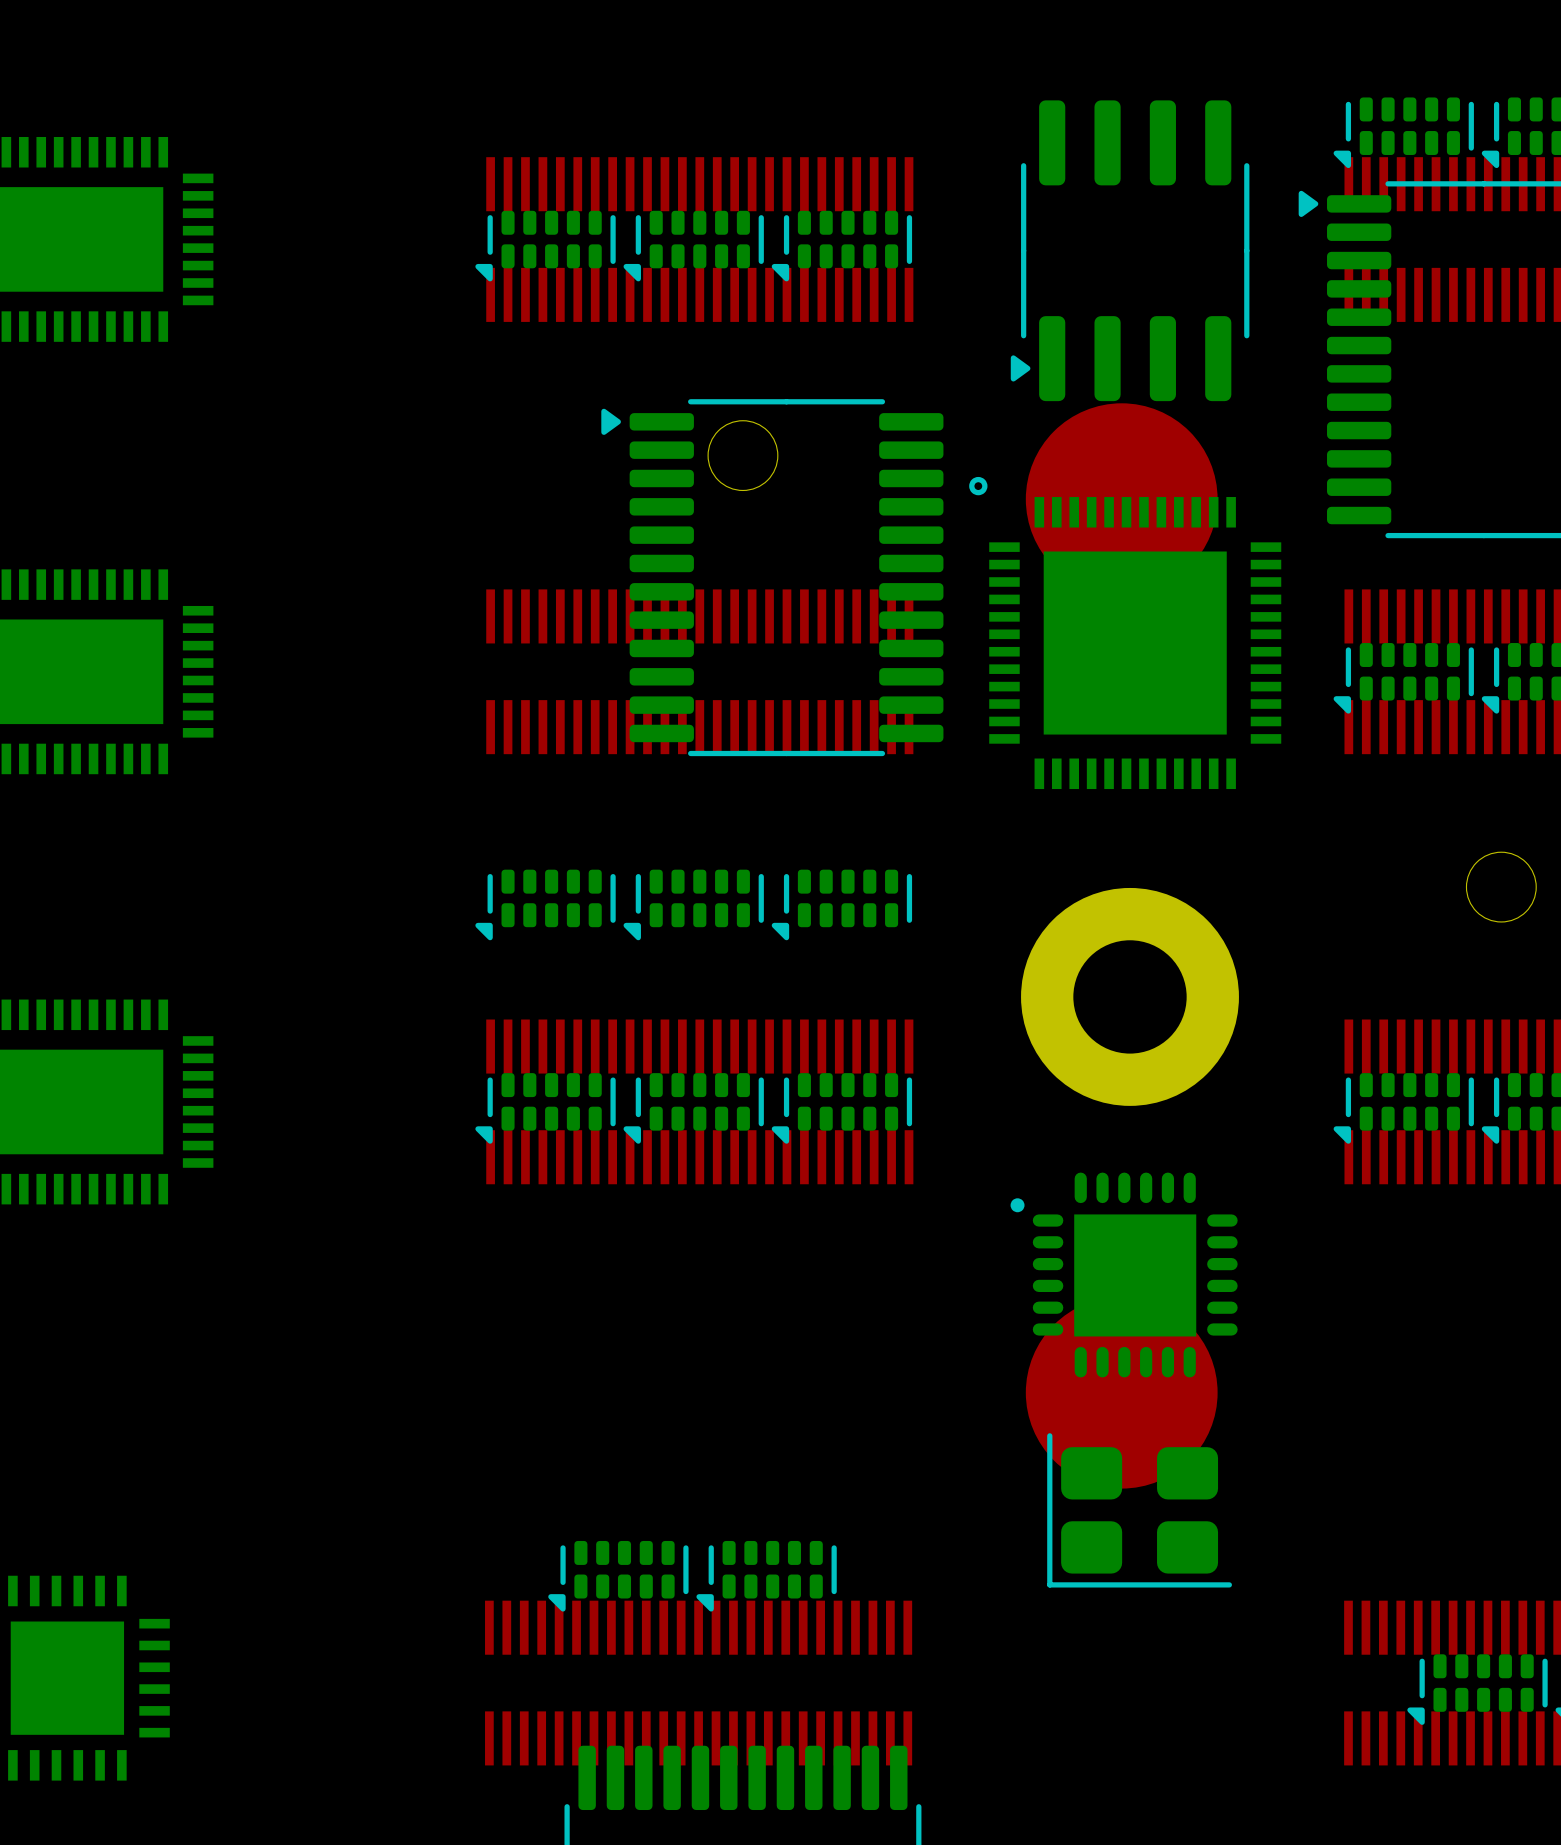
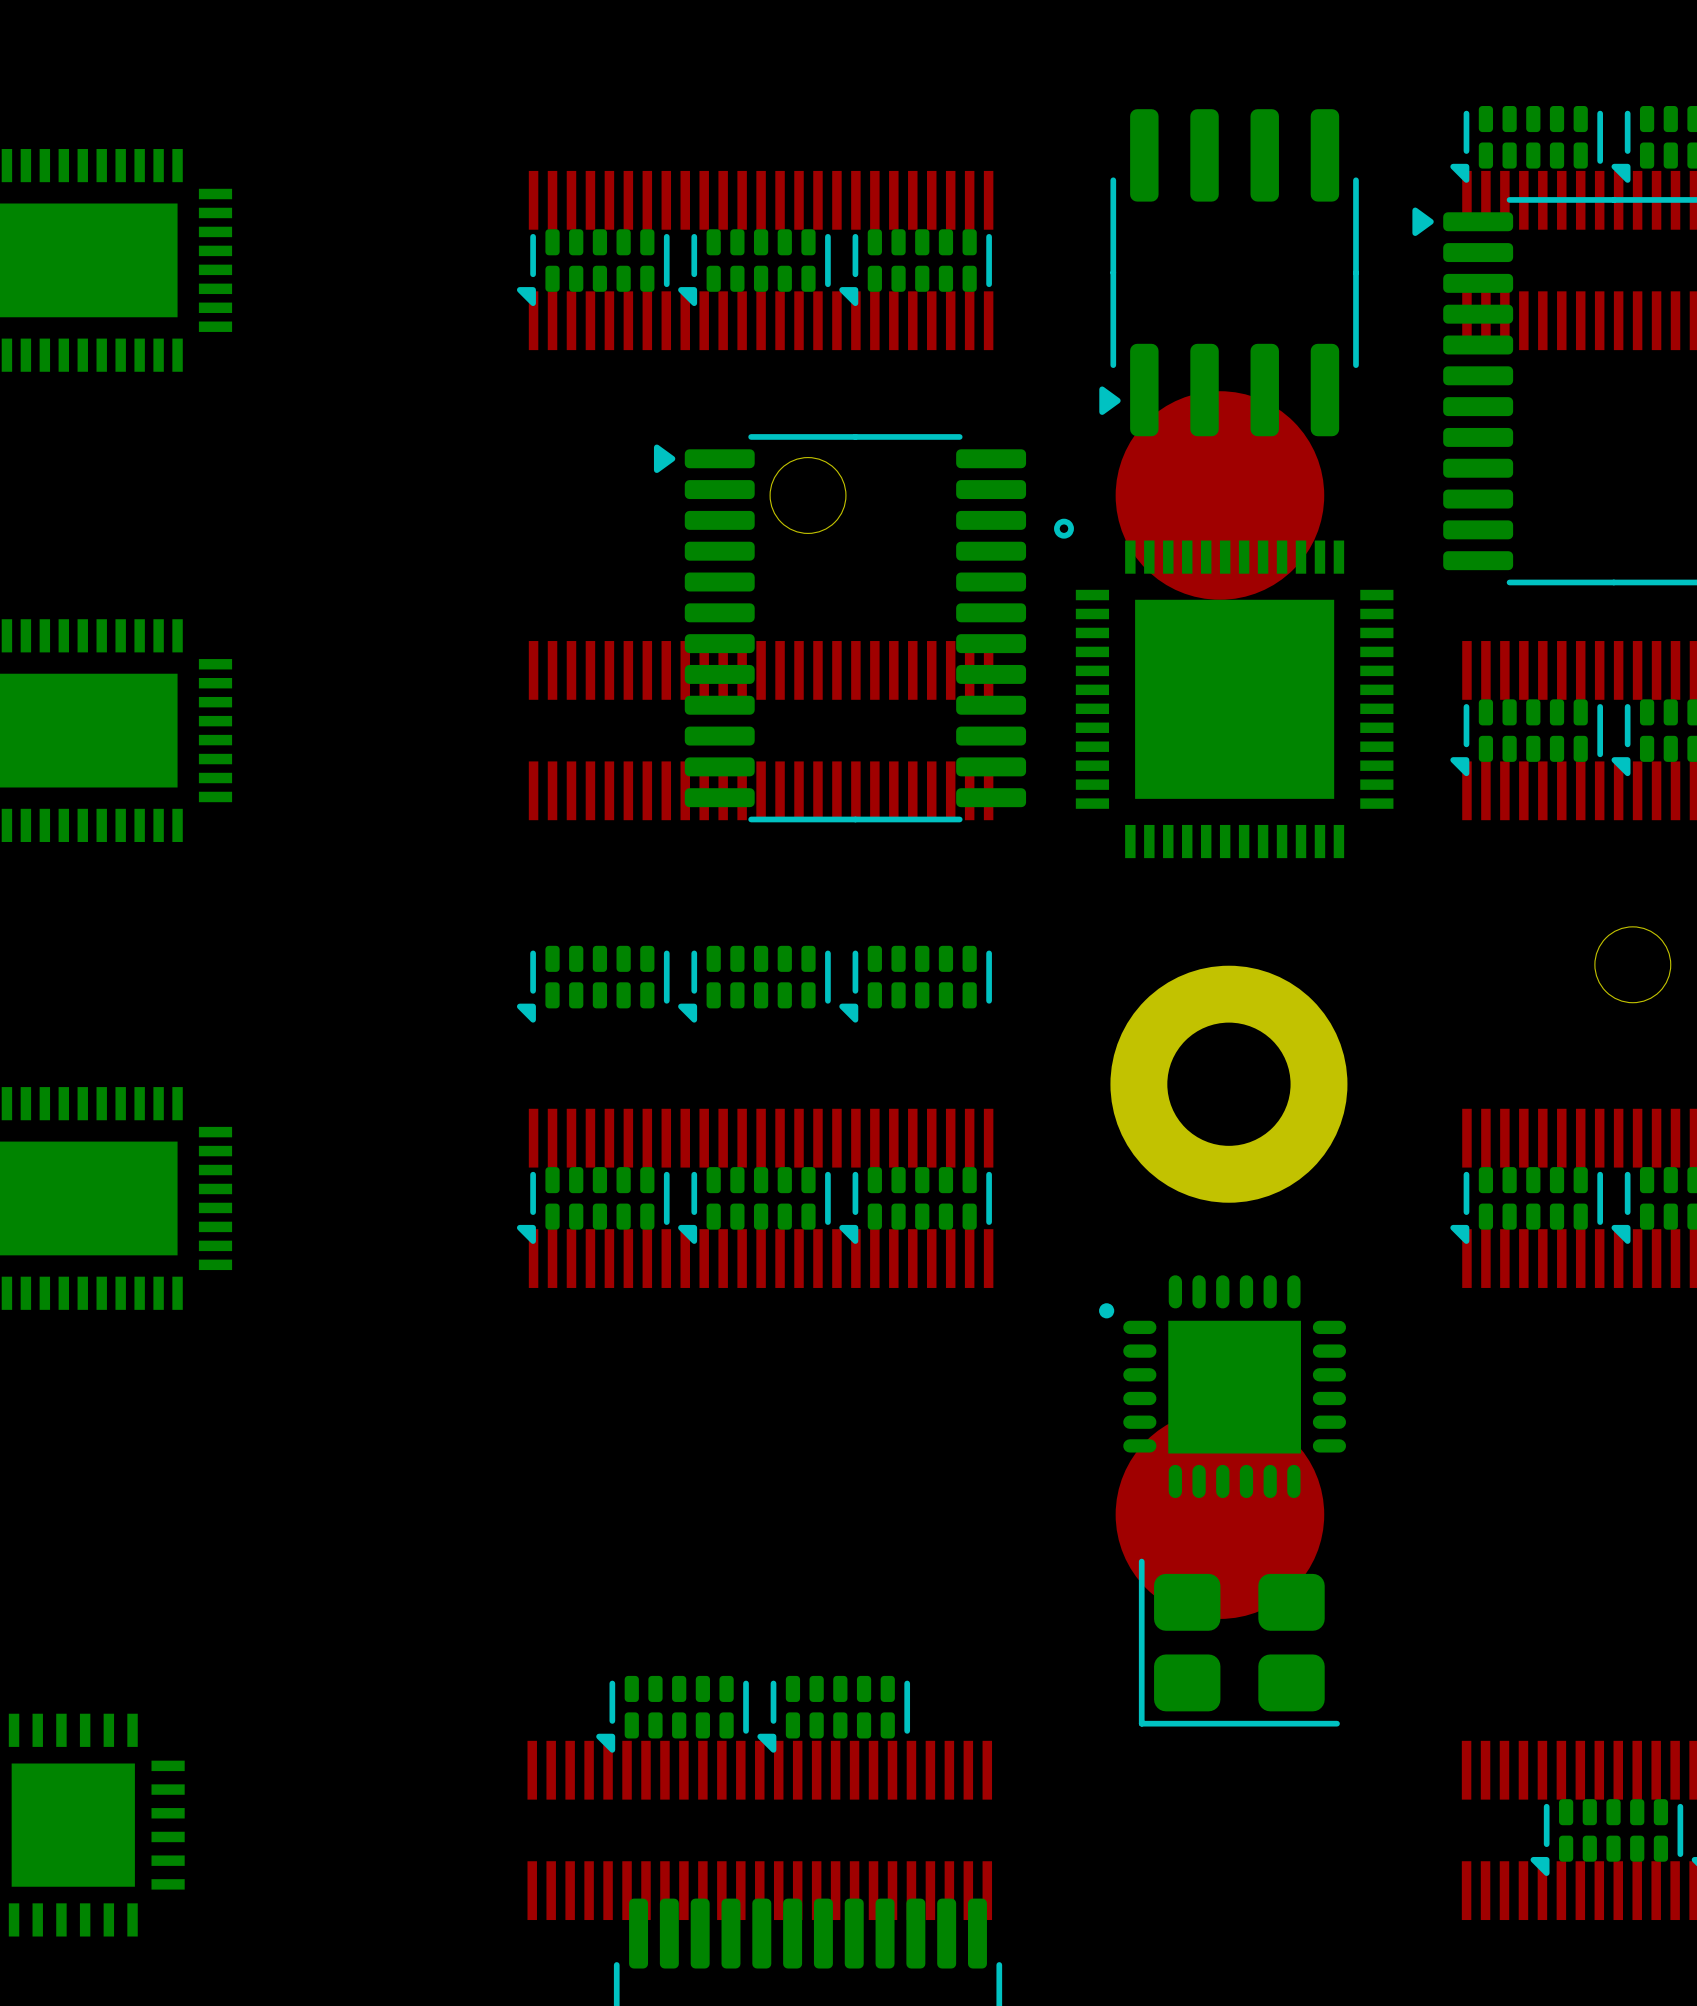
part position: (1121, 499) -> (1219, 495)

